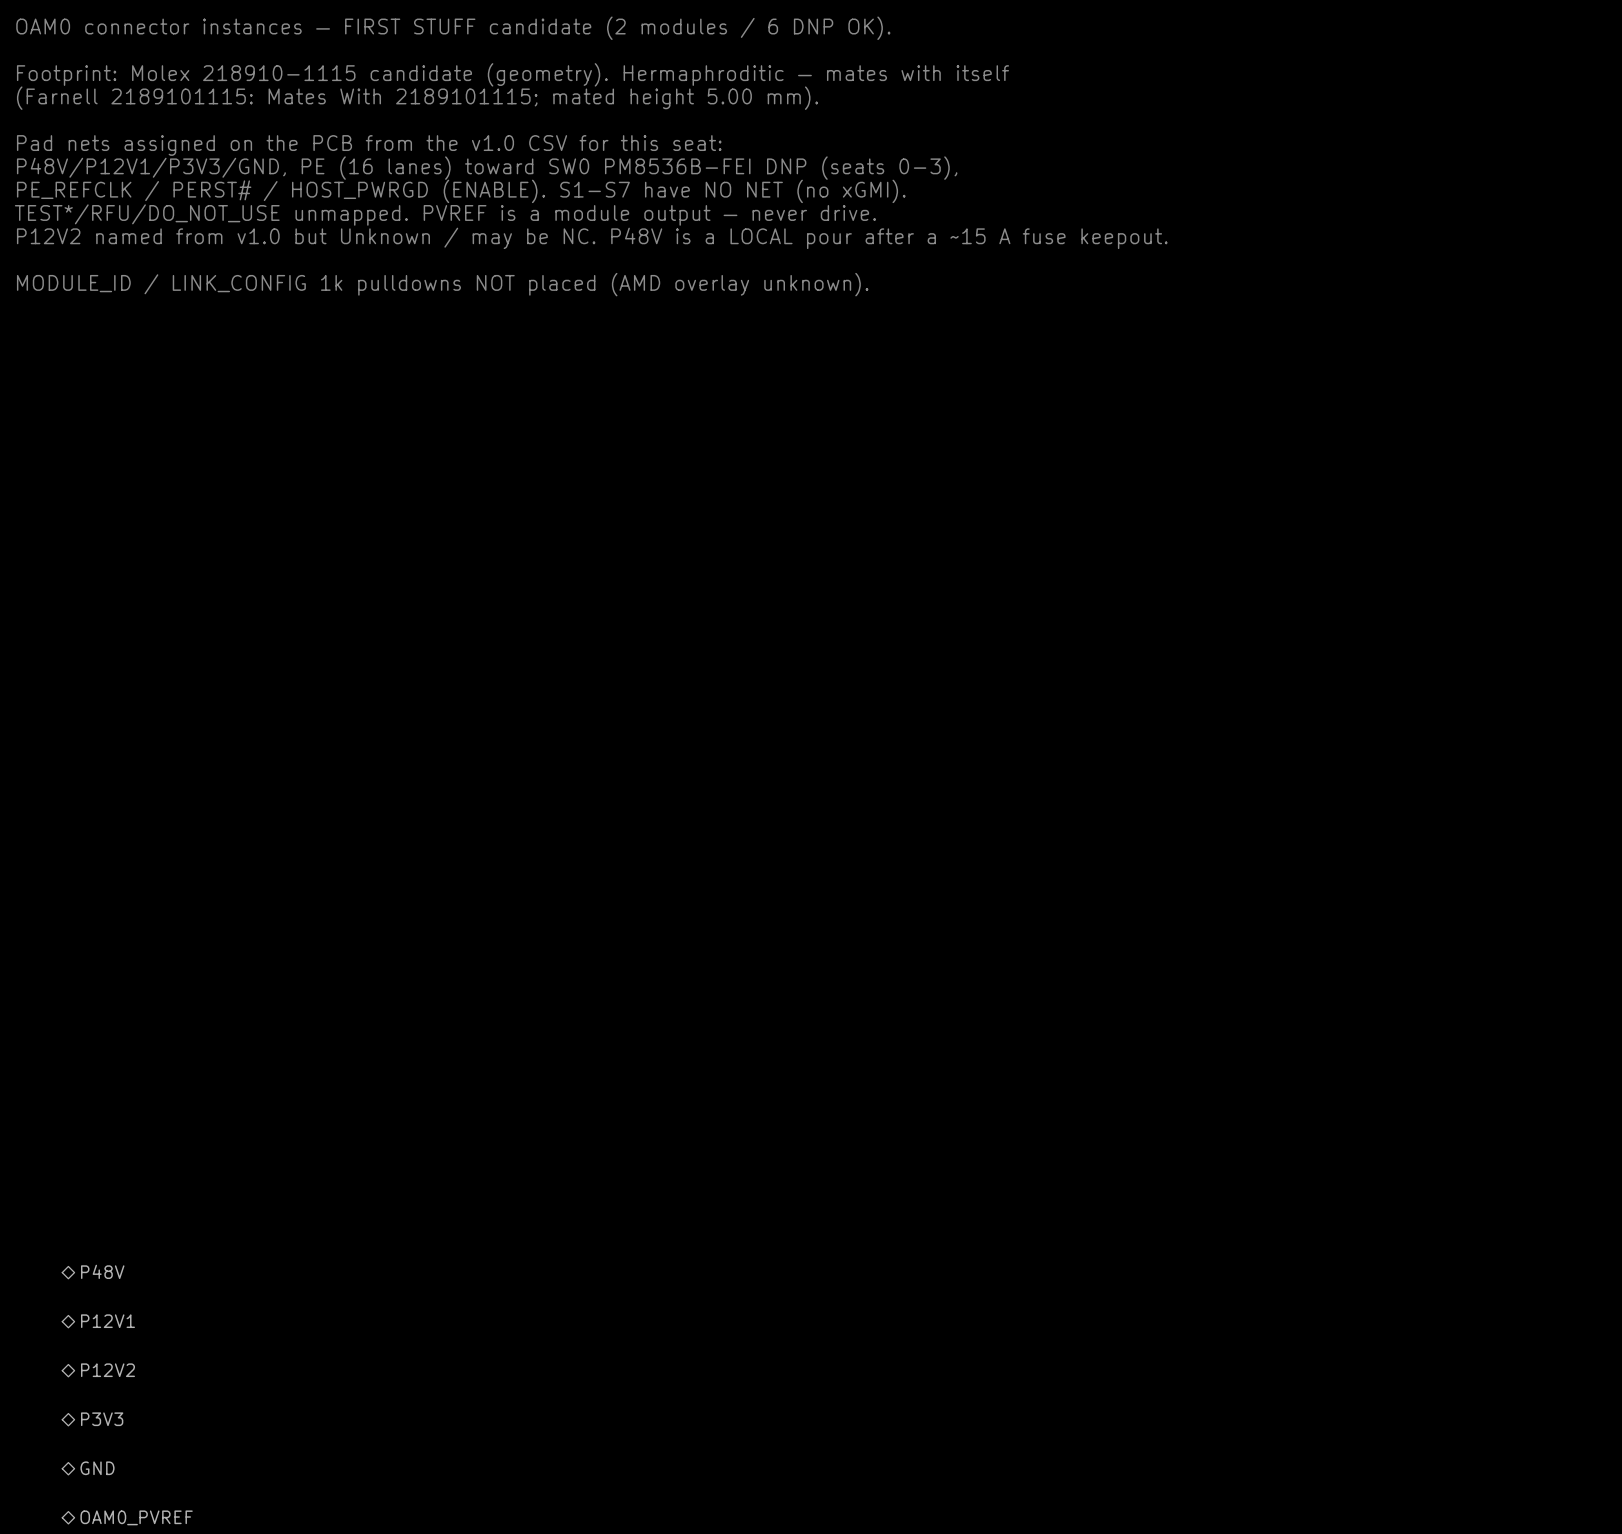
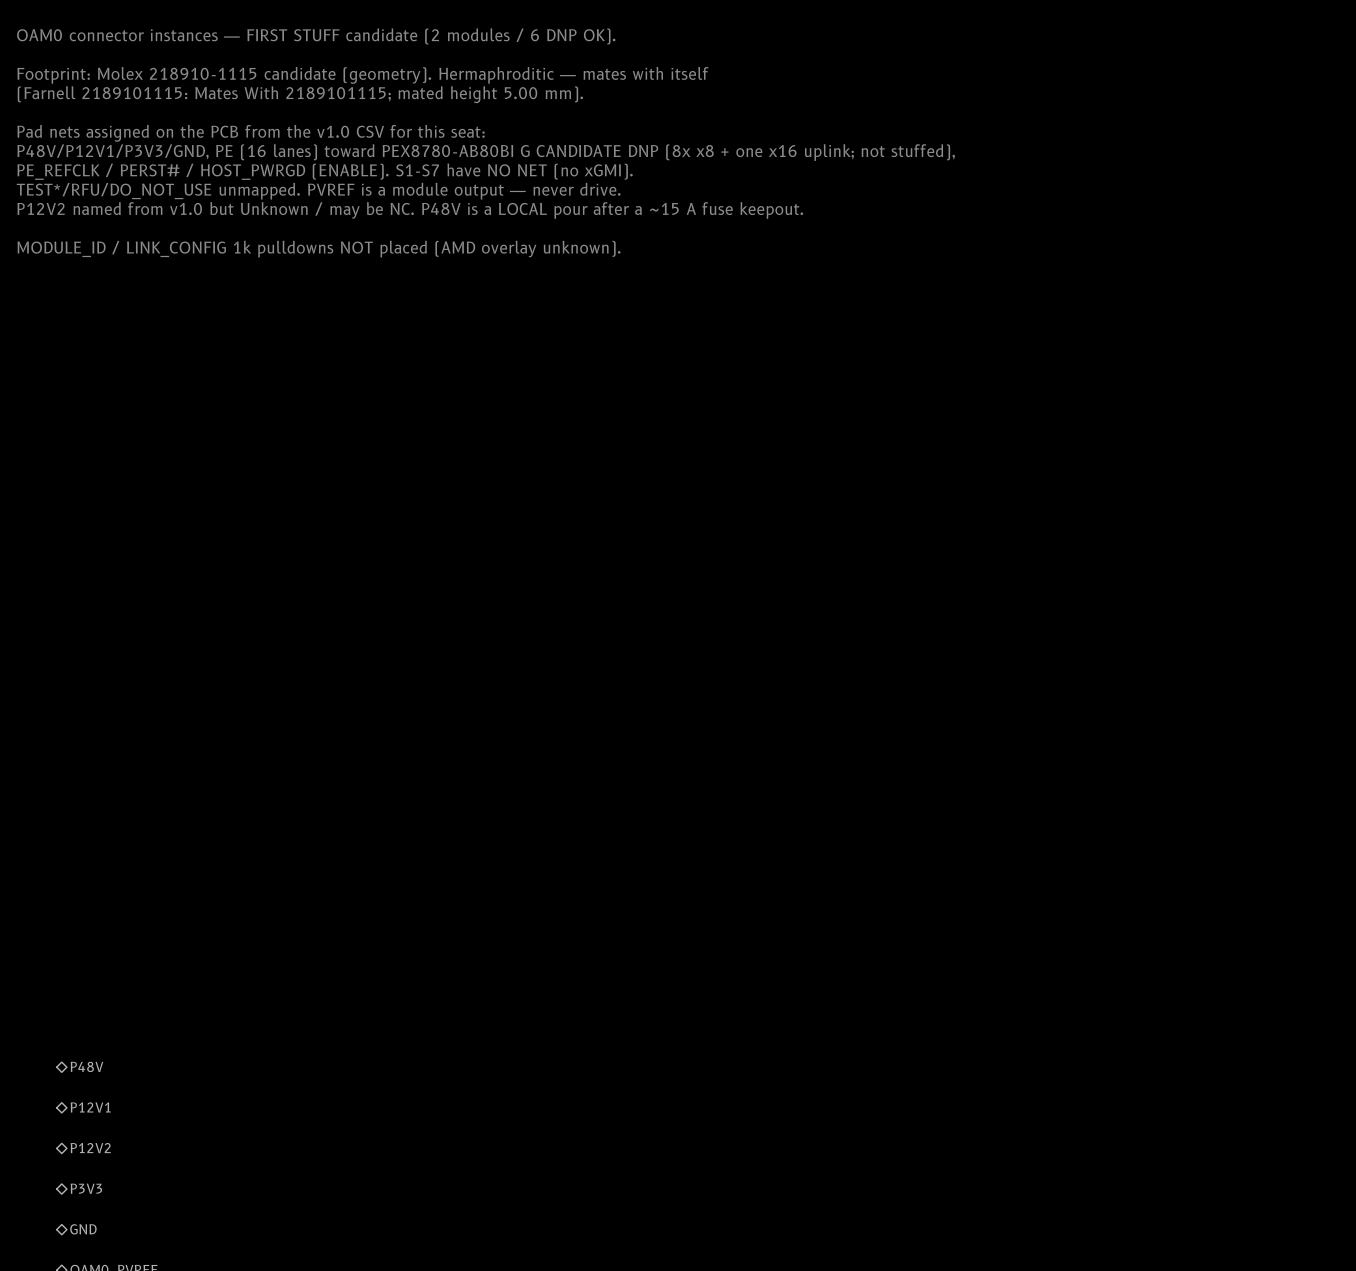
text: P48V/P12V1/P3V3/GND, PE (16 lanes) toward SW0 PM8536B-FEI DNP (seats 0-3), (487, 168) -> P48V/P12V1/P3V3/GND, PE (16 lanes) toward PEX8780-AB80BI G CANDIDATE DNP (8x x8 + one x16 uplink; not stuffed), (486, 152)

